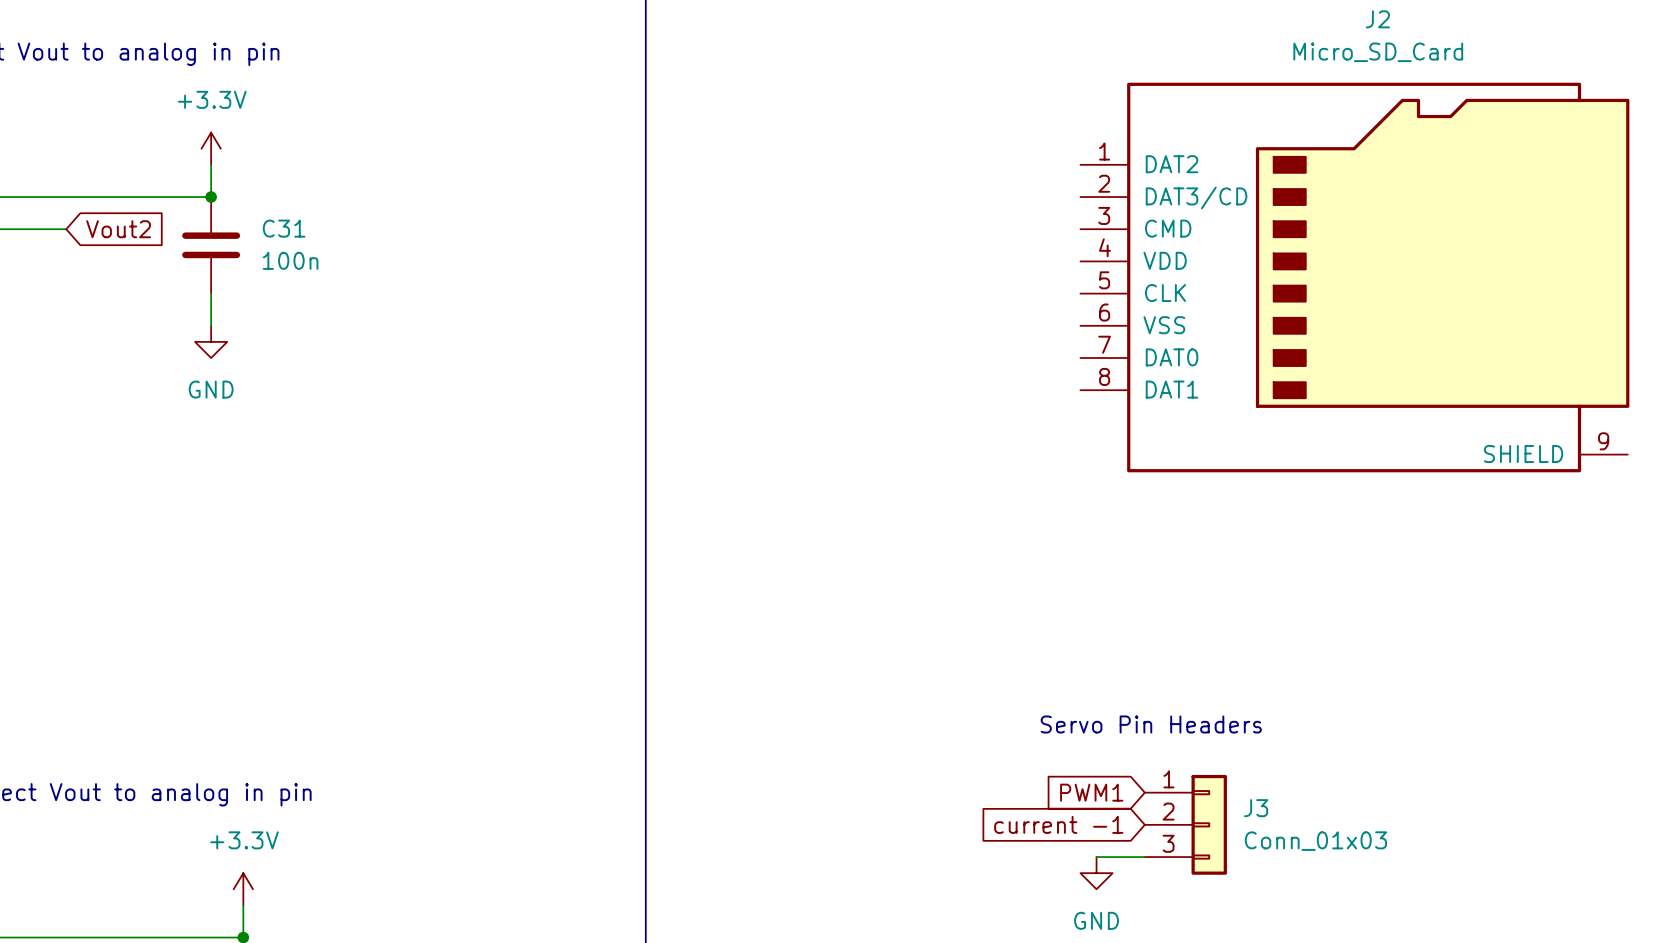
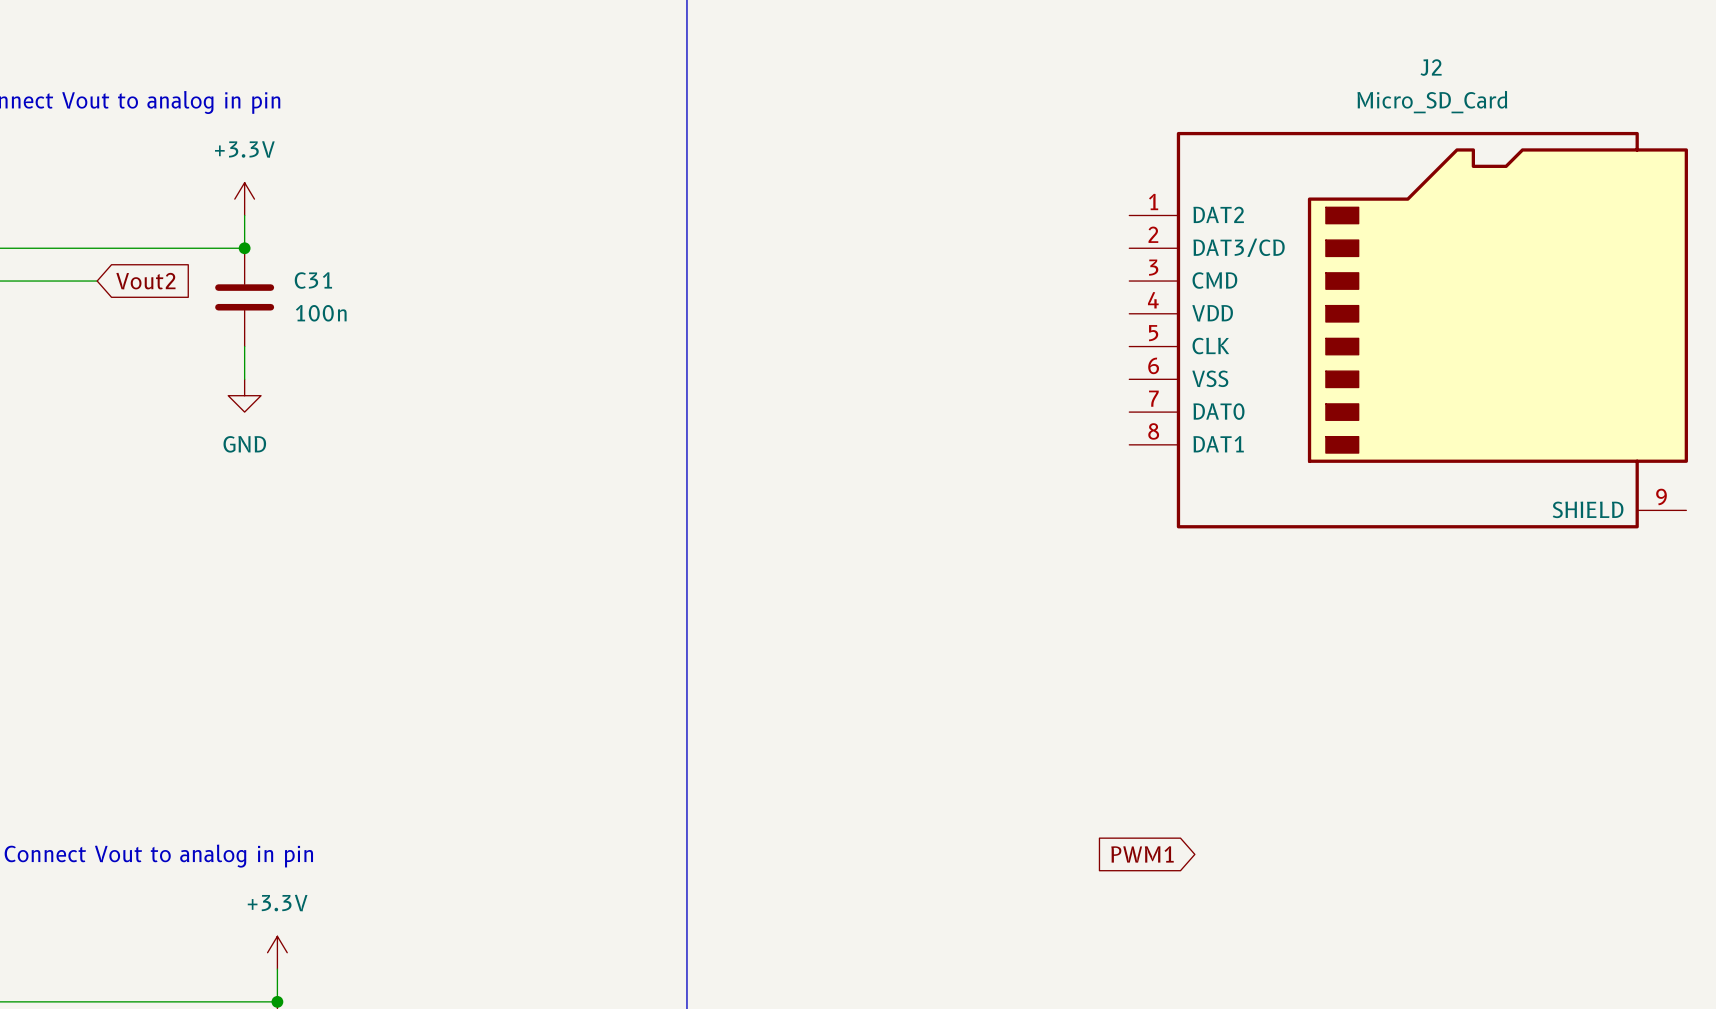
text: Servo Pin Headers (1151, 724) -> none
global label: current -1 (1058, 824) -> none
J3: Conn_01x03 (1185, 824) -> none
wire: (1096, 857) (1144, 857) -> none
power symbol: GND (1096, 873) -> none

